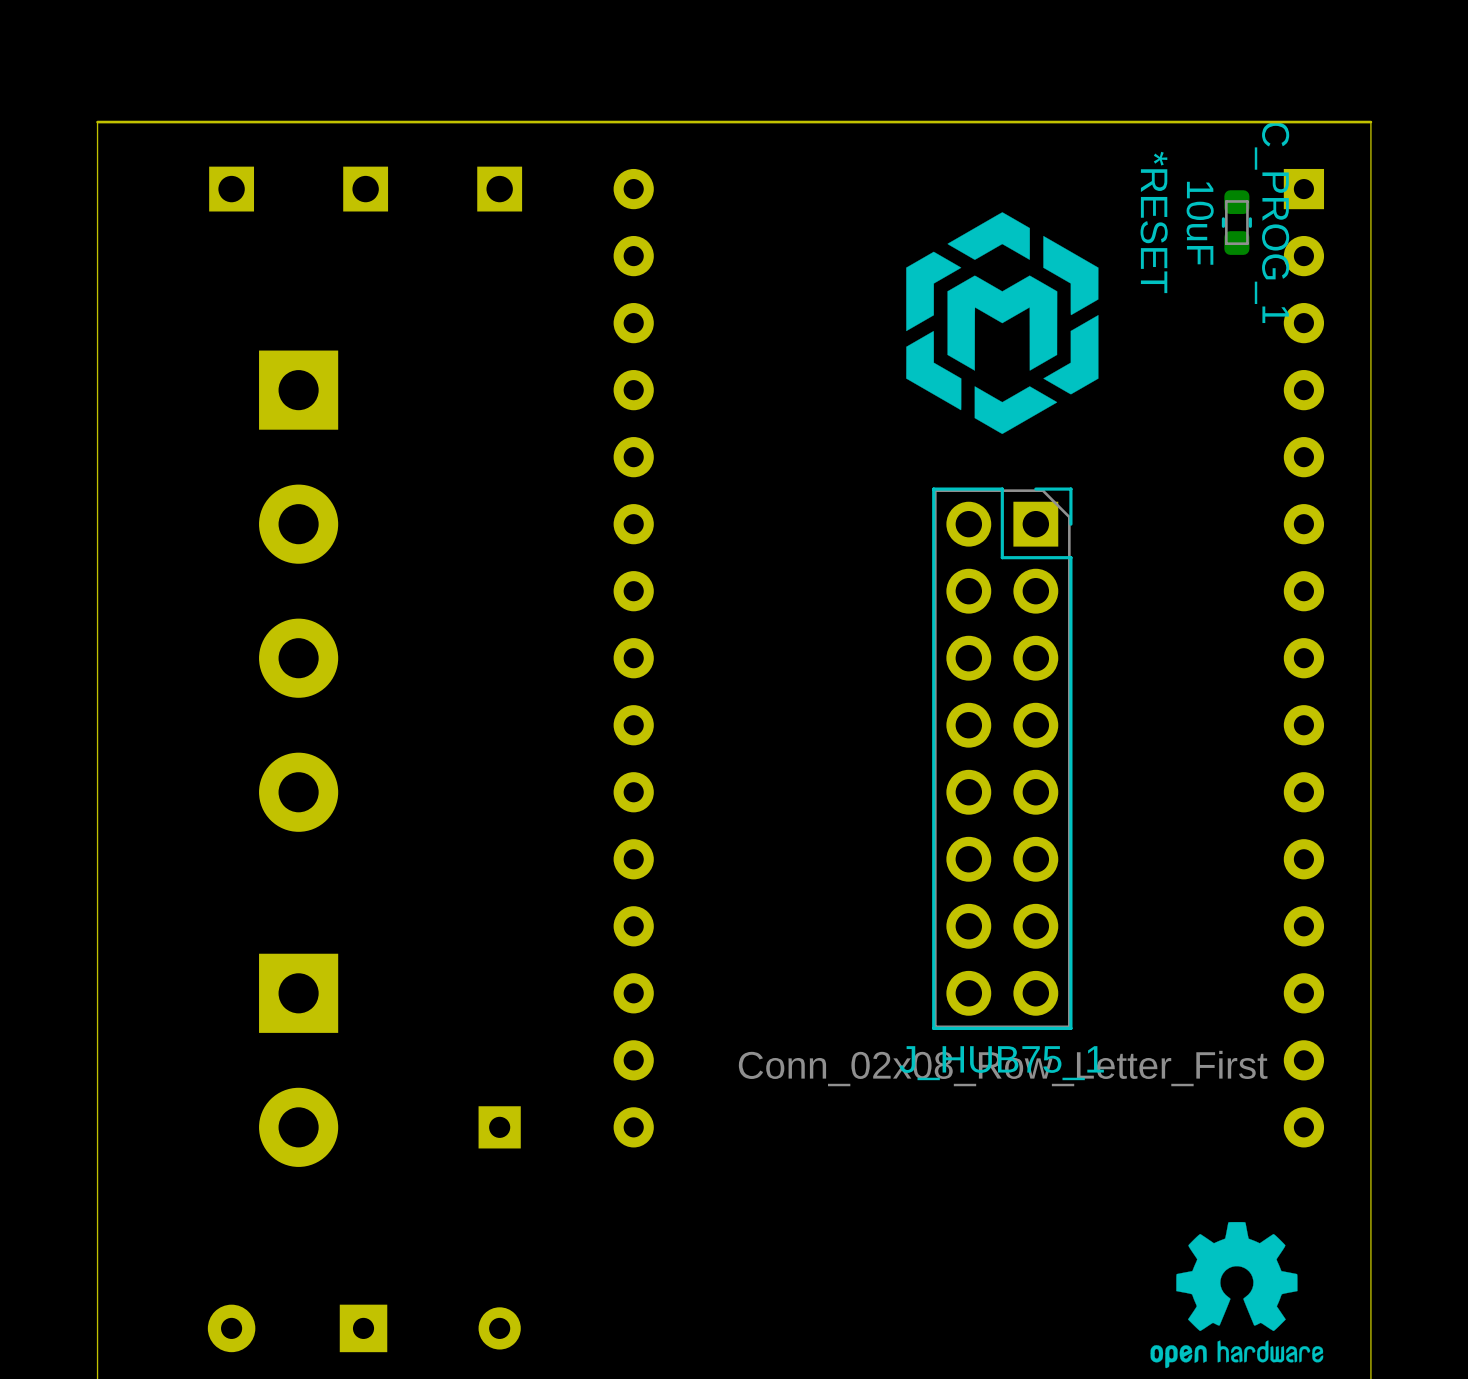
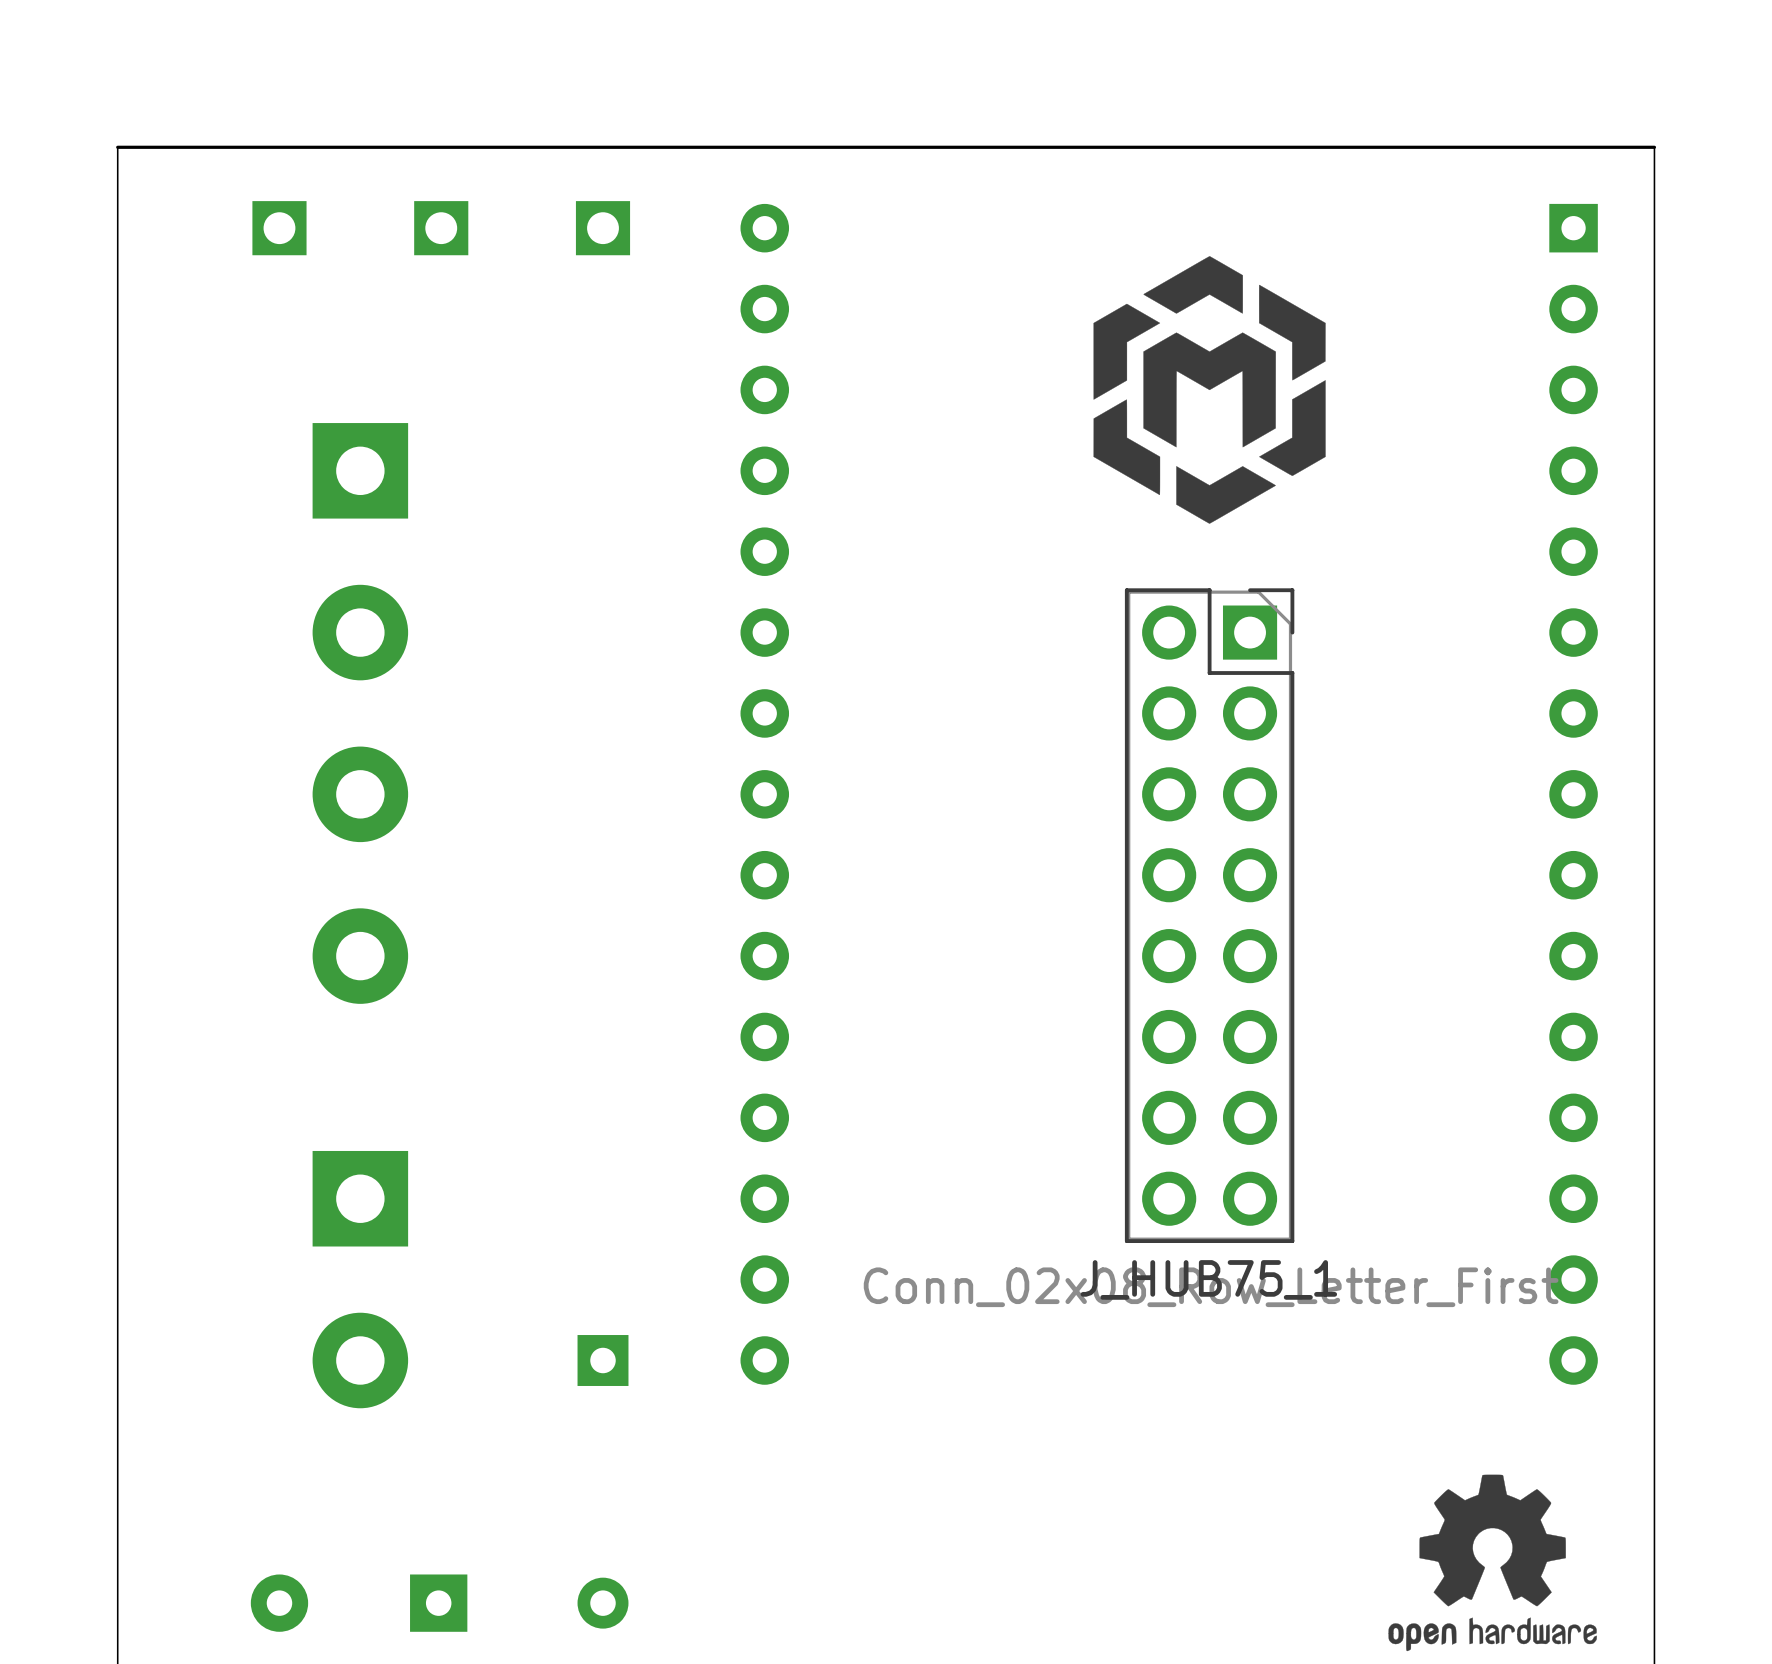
text: *RESET (1154, 222) -> none
C_PROG_1: 10uF (1236, 222) -> none

